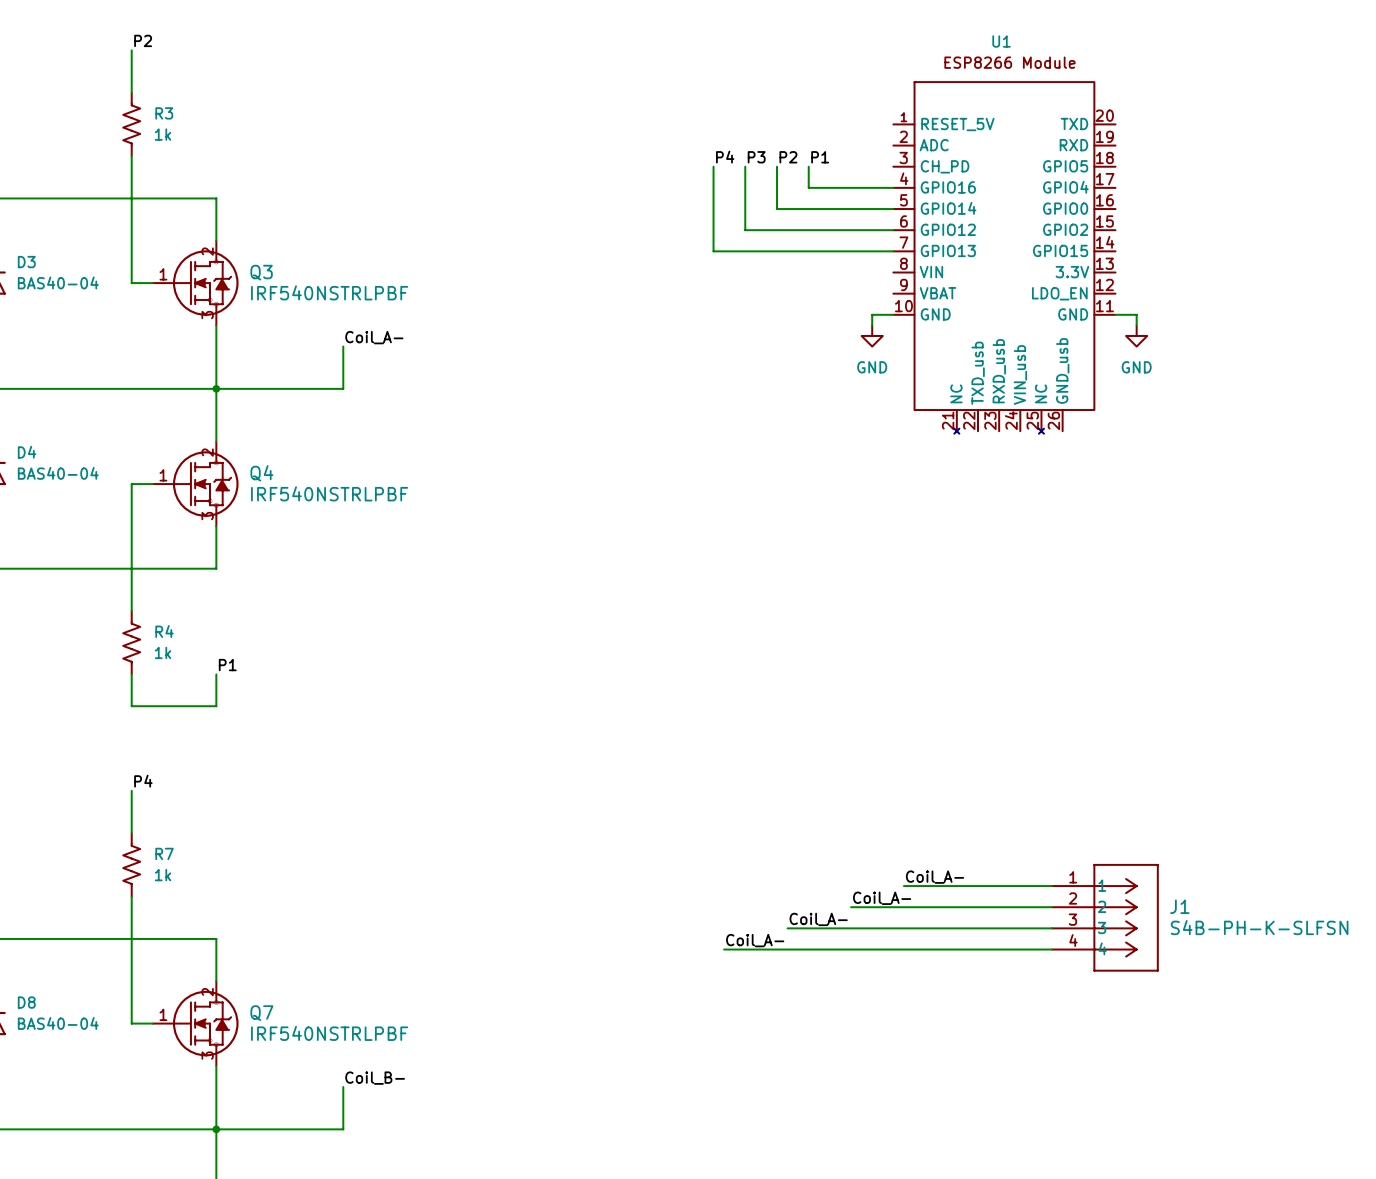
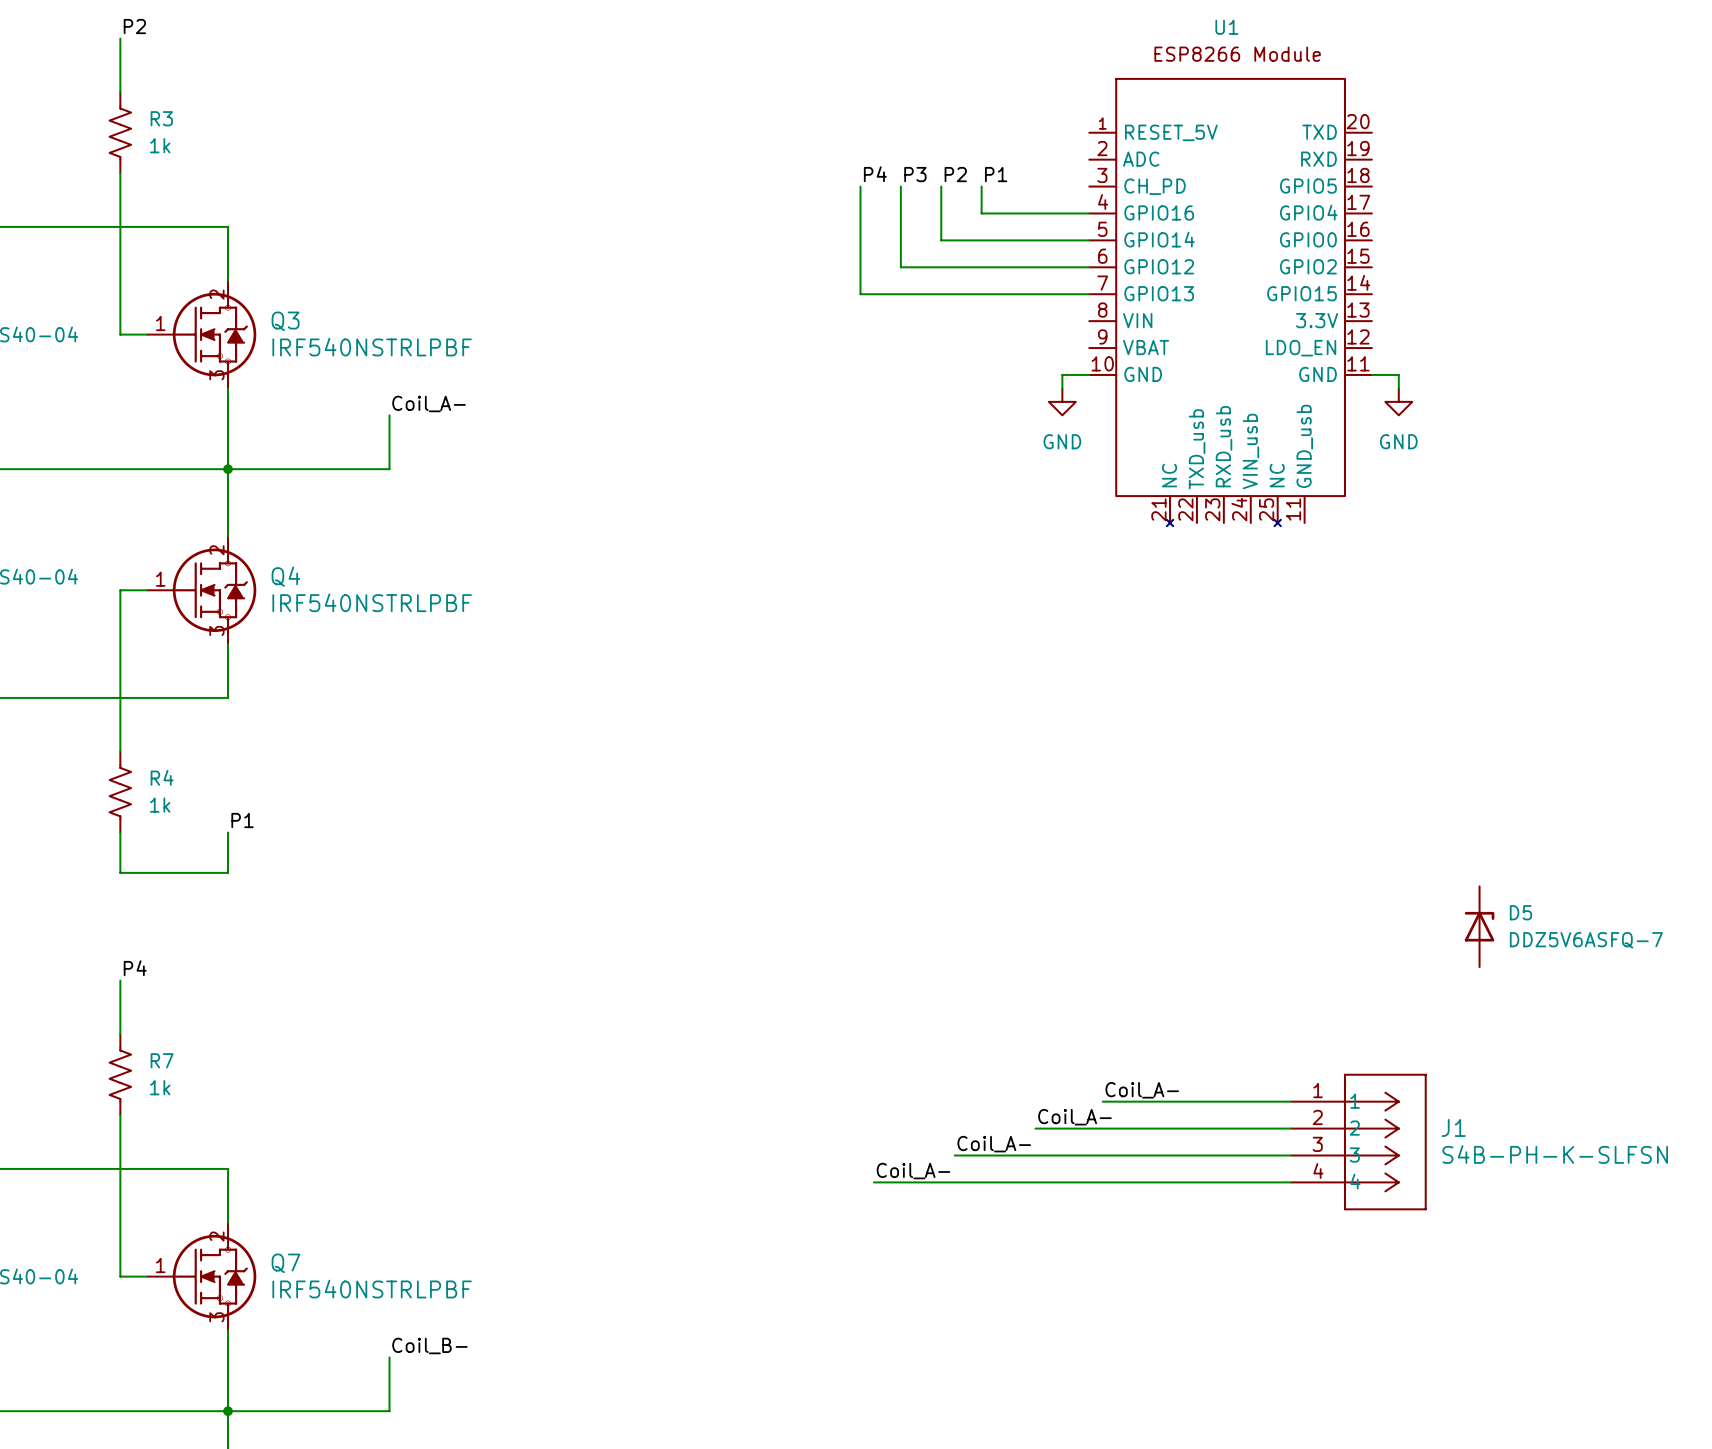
U1 pin number: 26 (1053, 420) -> 11 (1293, 509)
D5: none -> DDZ5V6ASFQ-7 (1479, 926)

